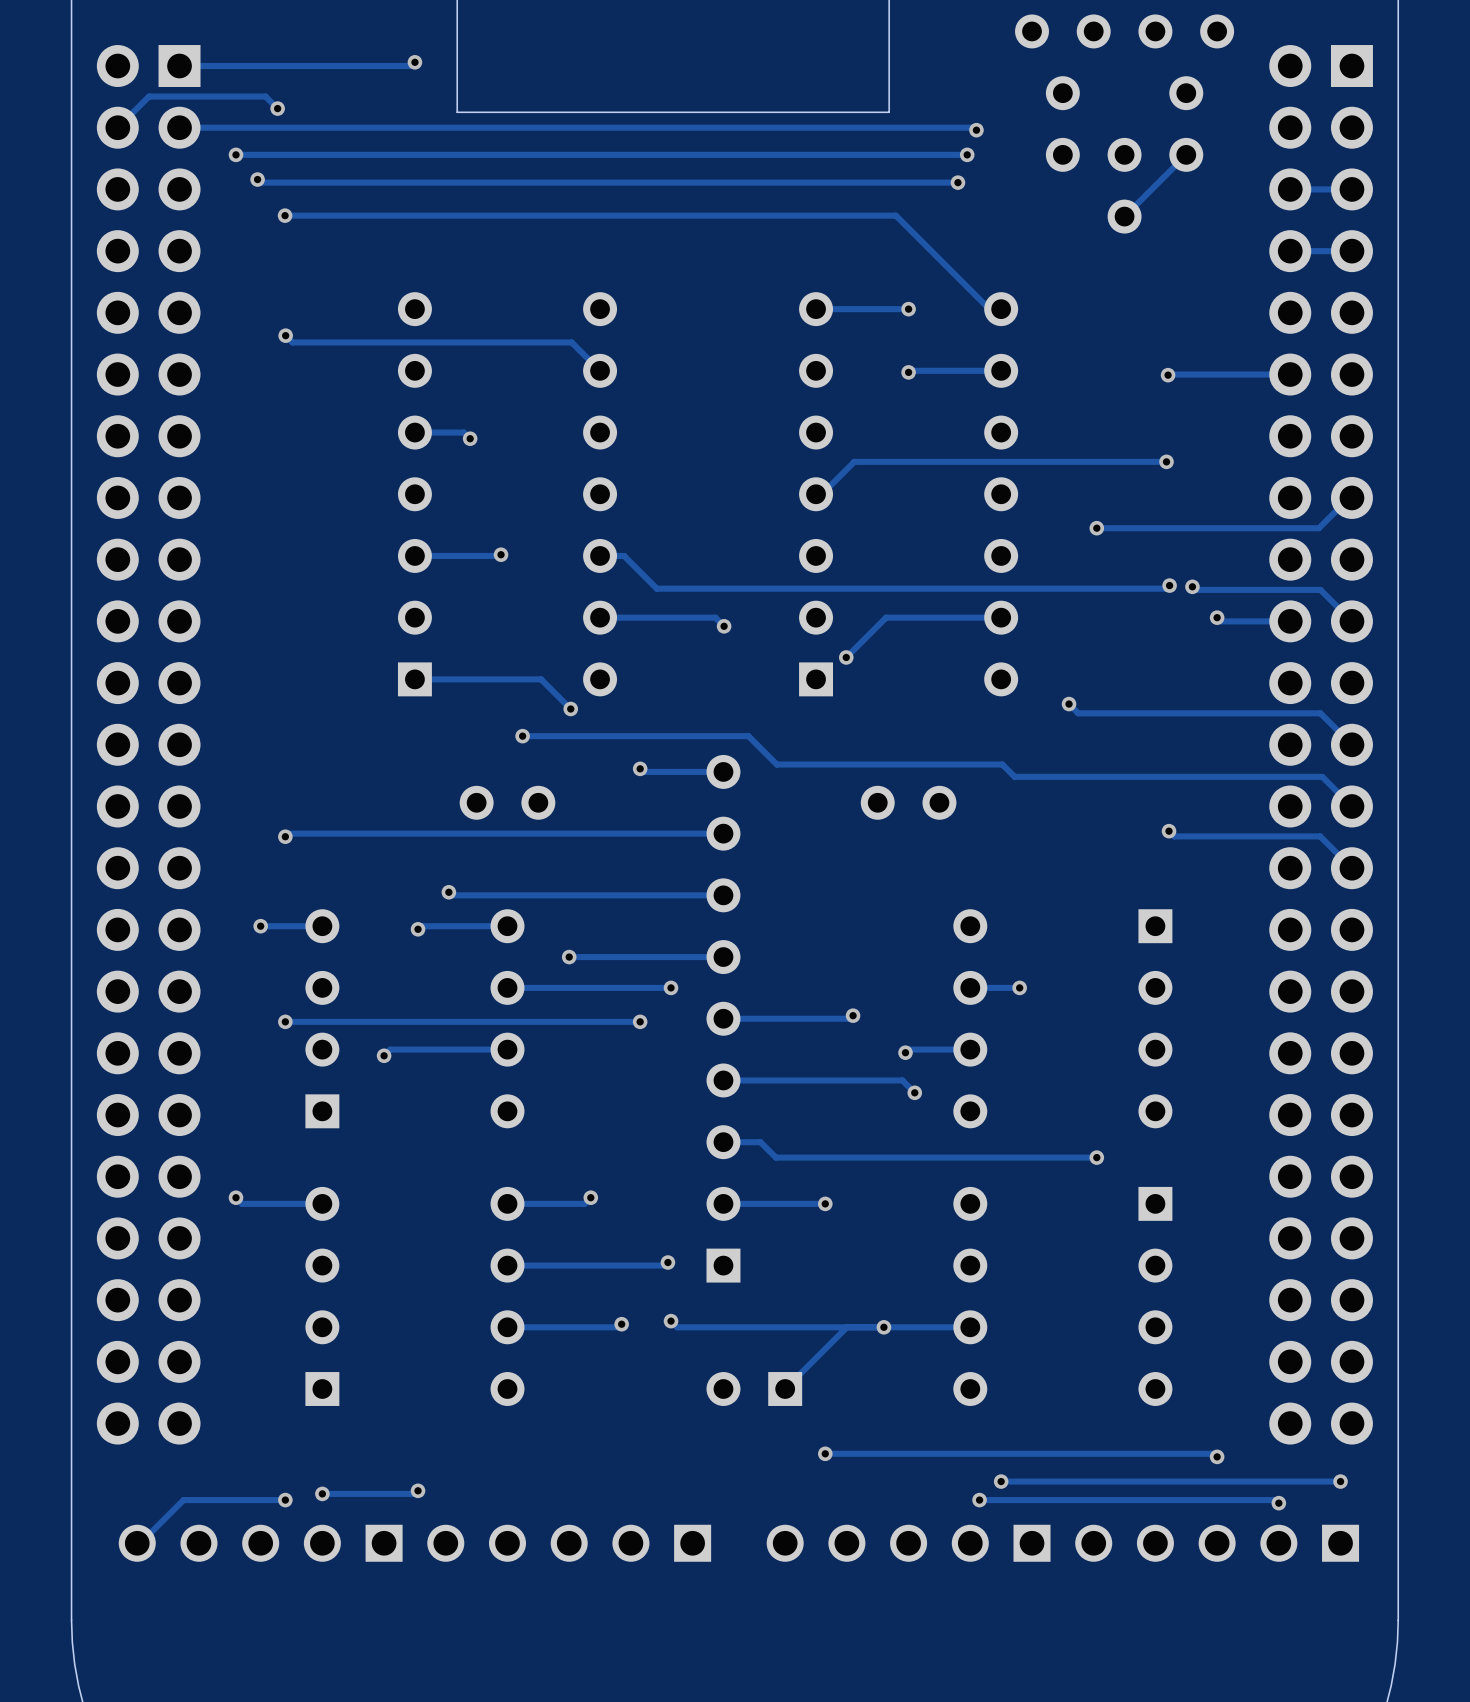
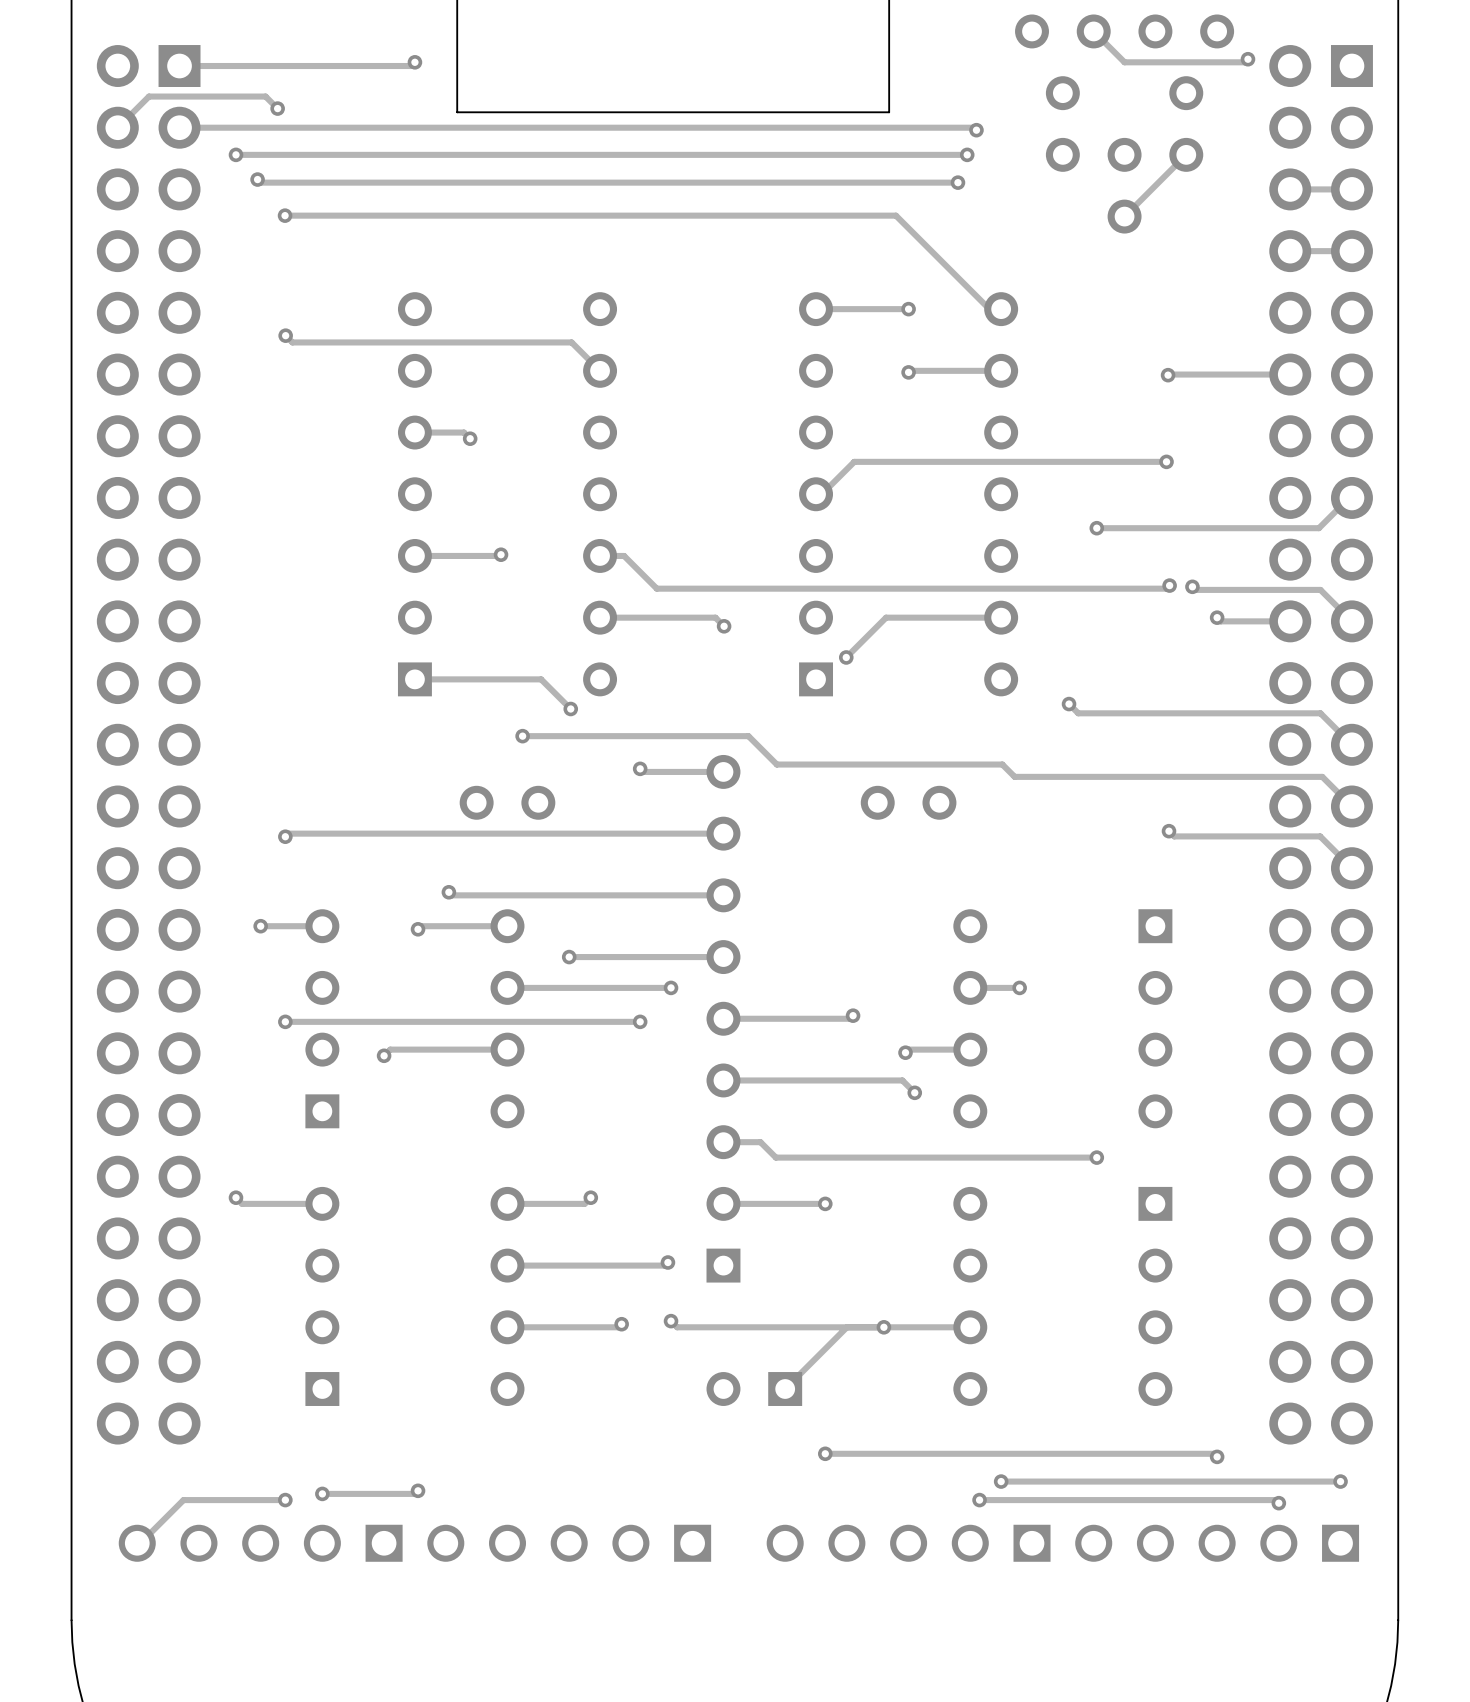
track: none -> (1093, 31) (1124, 62) (1244, 62) (1247, 59)
via: none -> (1247, 59)

